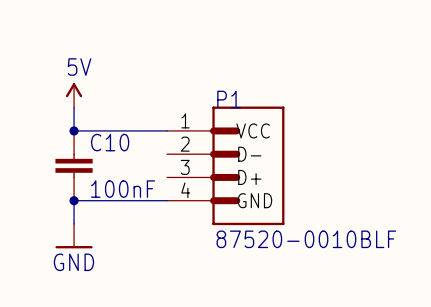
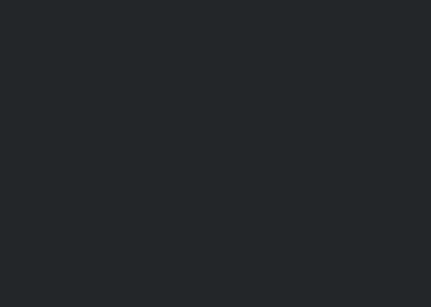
power symbol: 5V (74, 95) -> none
wire: (74, 107) (74, 130) (167, 130) -> none
junction: (74, 130) -> none
C10: 100nF (74, 165) -> none
P1: 87520-0010BLF (225, 165) -> none
junction: (74, 200) -> none
wire: (167, 200) (74, 200) (74, 223) -> none
power symbol: GND (74, 236) -> none

